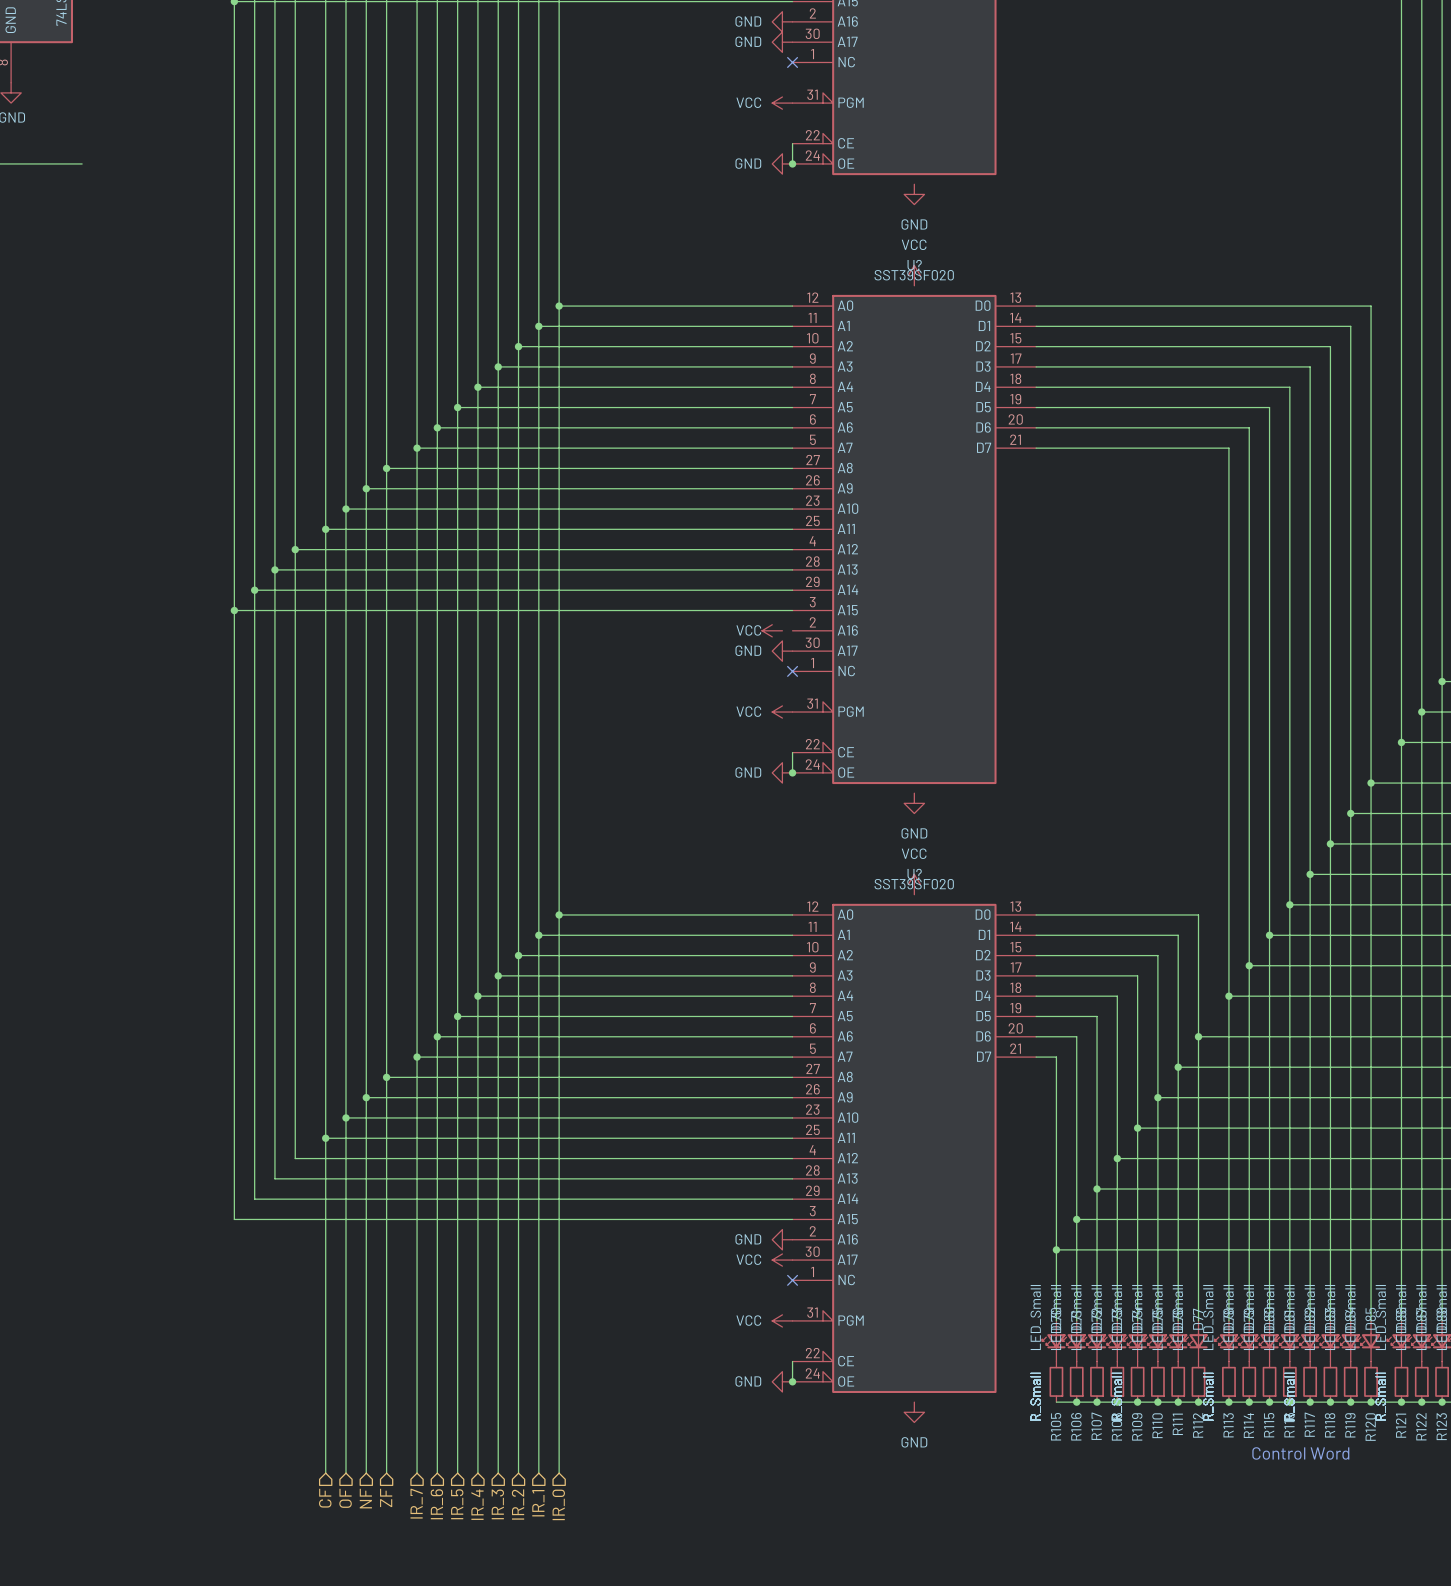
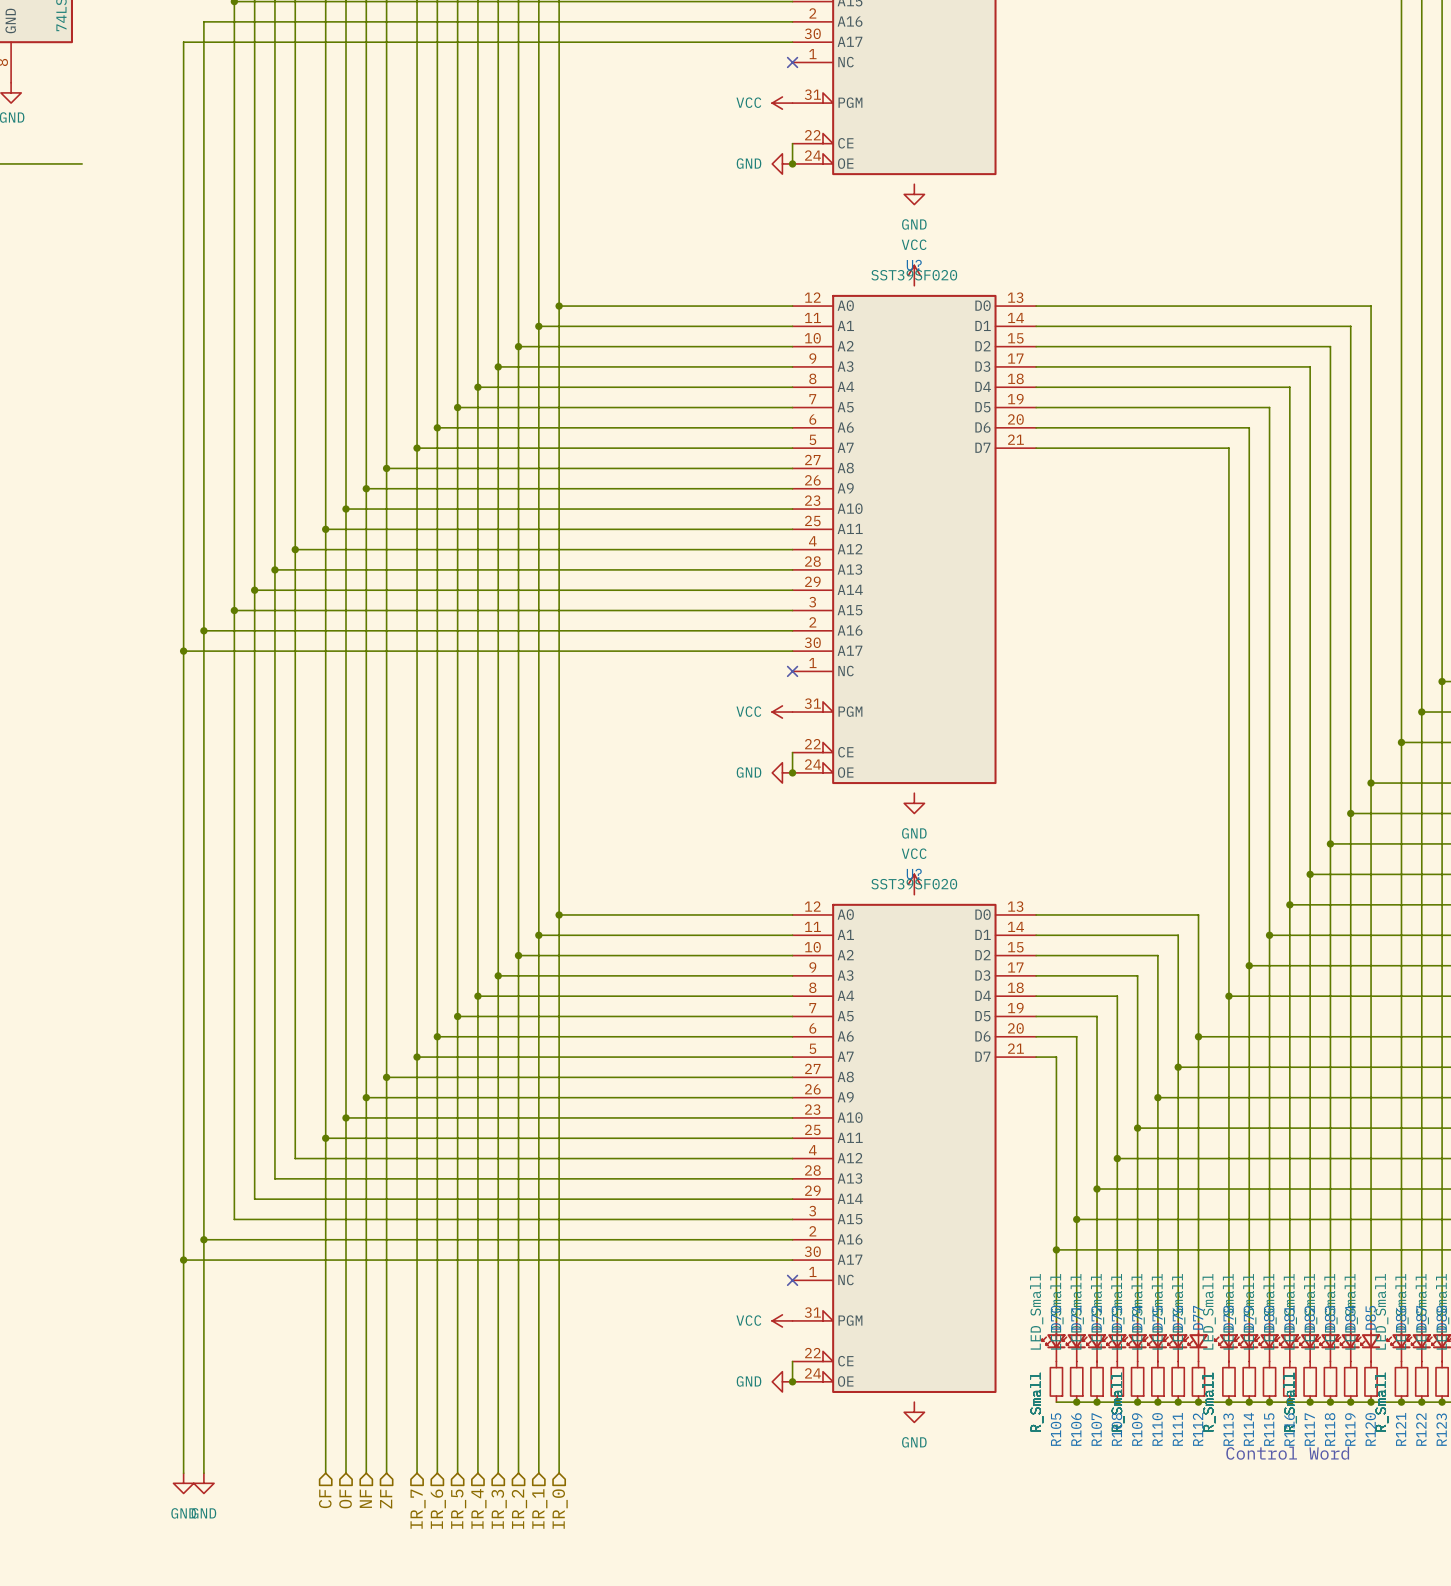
power symbol: GND (782, 21) -> none
wire: none -> (792, 21) (203, 21) (203, 1473)
power symbol: GND (782, 42) -> none
wire: none -> (792, 42) (183, 42) (183, 1473)
wire: none -> (203, 630) (792, 630)
junction: none -> (203, 630)
power symbol: VCC (772, 630) -> none
wire: none -> (183, 651) (792, 651)
junction: none -> (183, 651)
power symbol: GND (782, 651) -> none
wire: none -> (203, 1239) (792, 1239)
junction: none -> (203, 1239)
power symbol: GND (782, 1239) -> none
wire: none -> (183, 1260) (792, 1260)
junction: none -> (183, 1260)
power symbol: VCC (782, 1260) -> none
power symbol: none -> GND (183, 1483)
power symbol: none -> GND (203, 1483)

